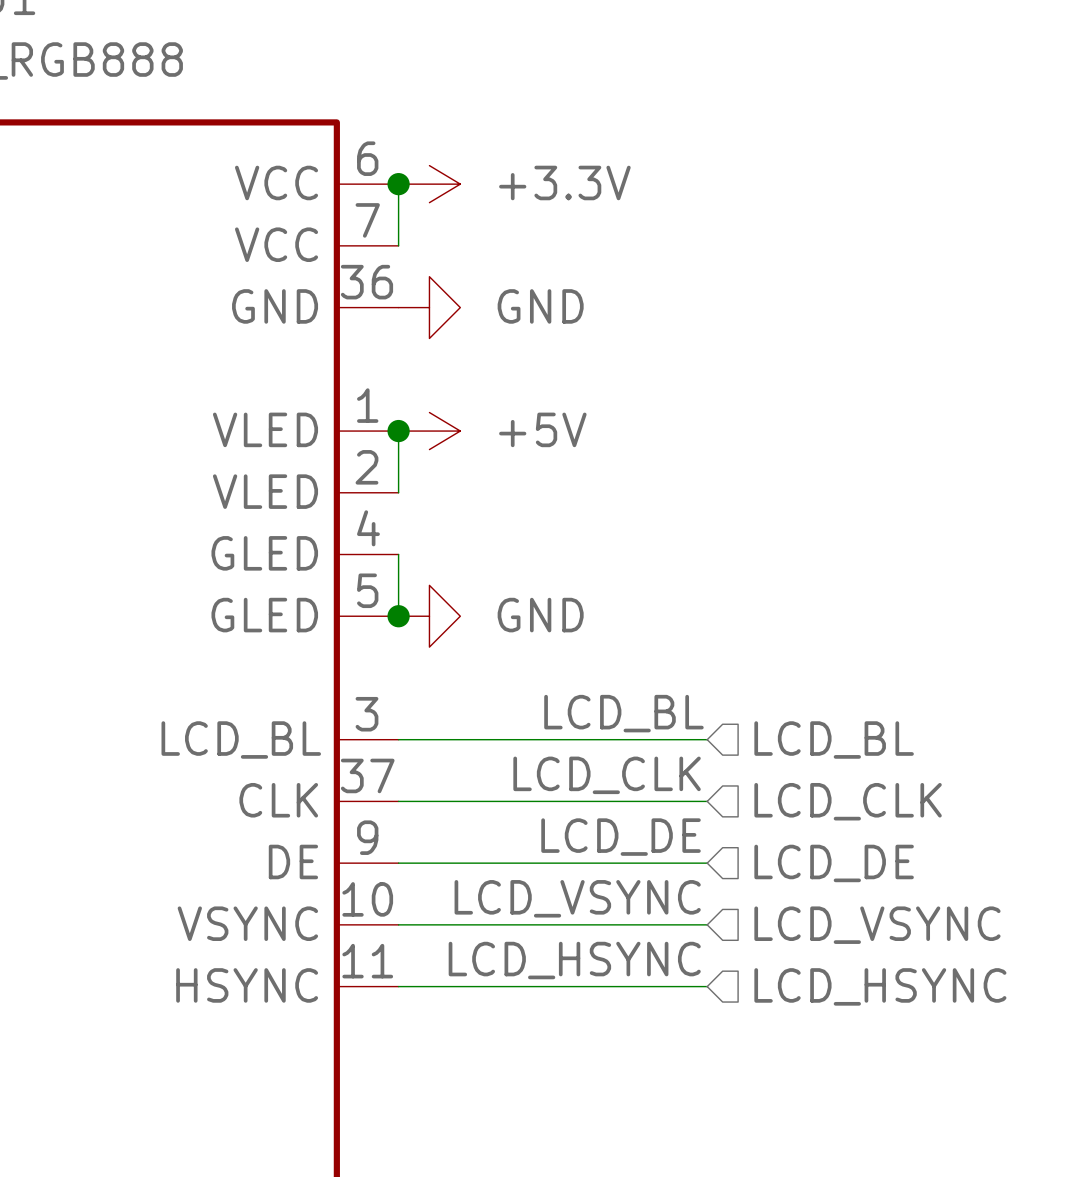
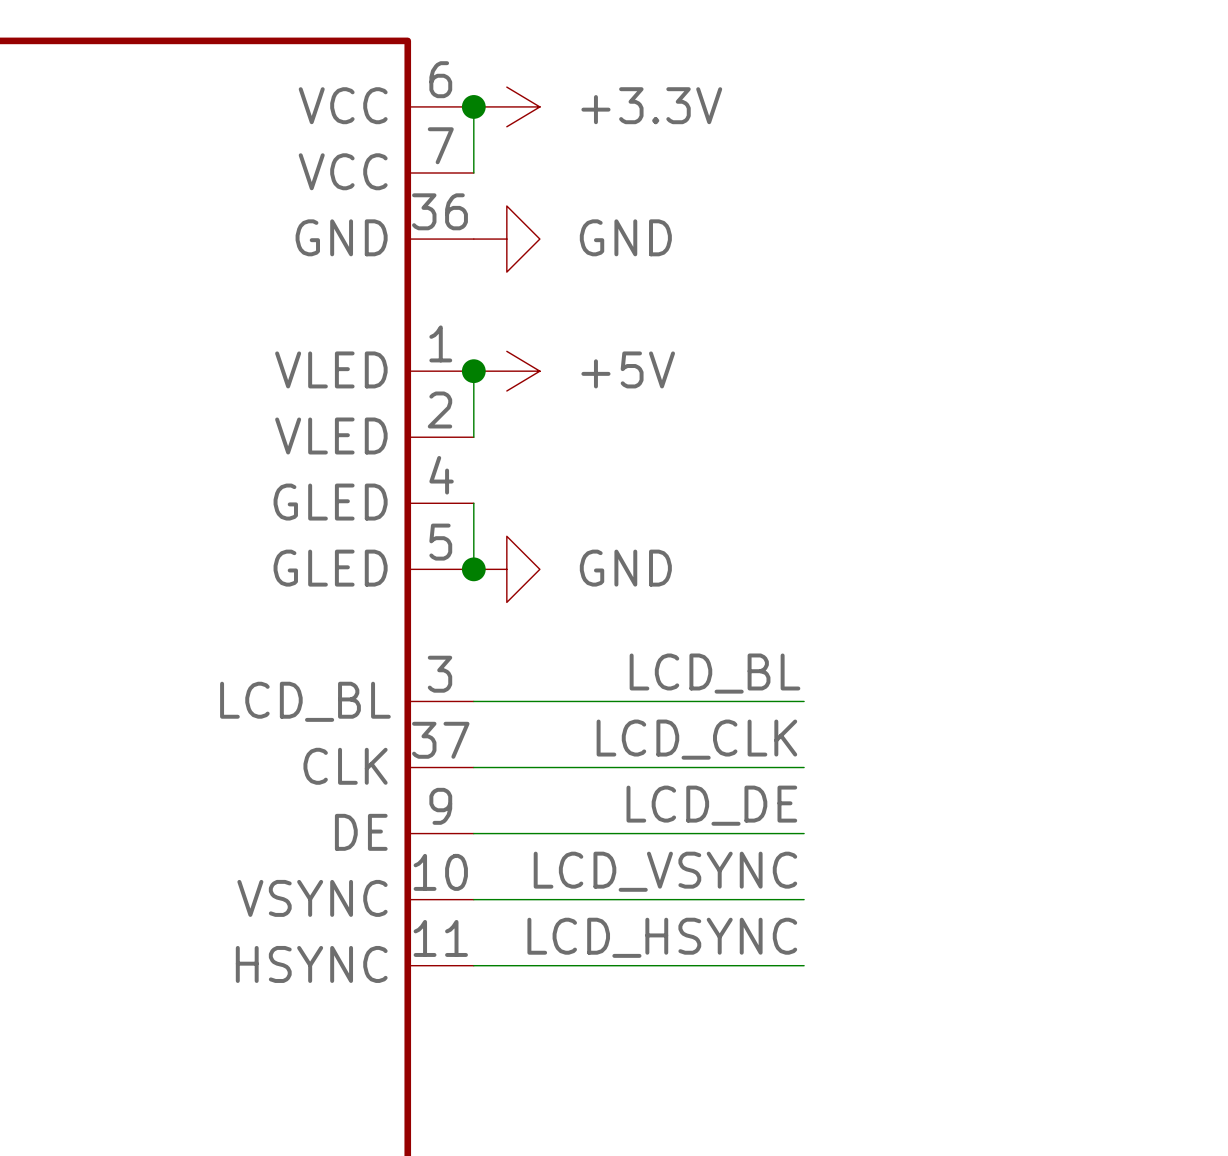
hierarchical label: LCD_BL (834, 740) -> none
hierarchical label: LCD_CLK (848, 801) -> none
hierarchical label: LCD_DE (834, 863) -> none
hierarchical label: LCD_VSYNC (877, 925) -> none
hierarchical label: LCD_HSYNC (880, 986) -> none

